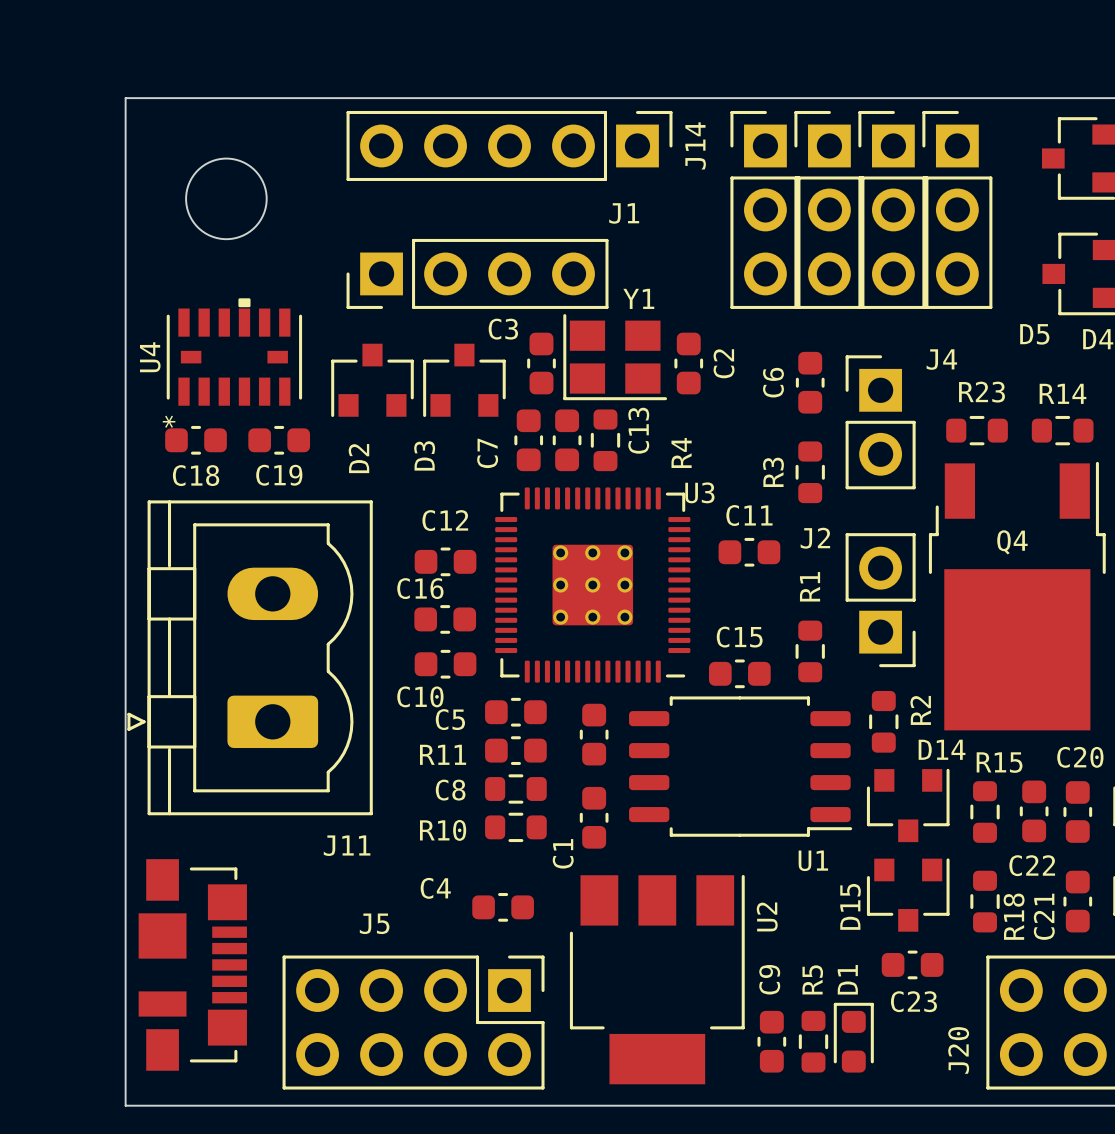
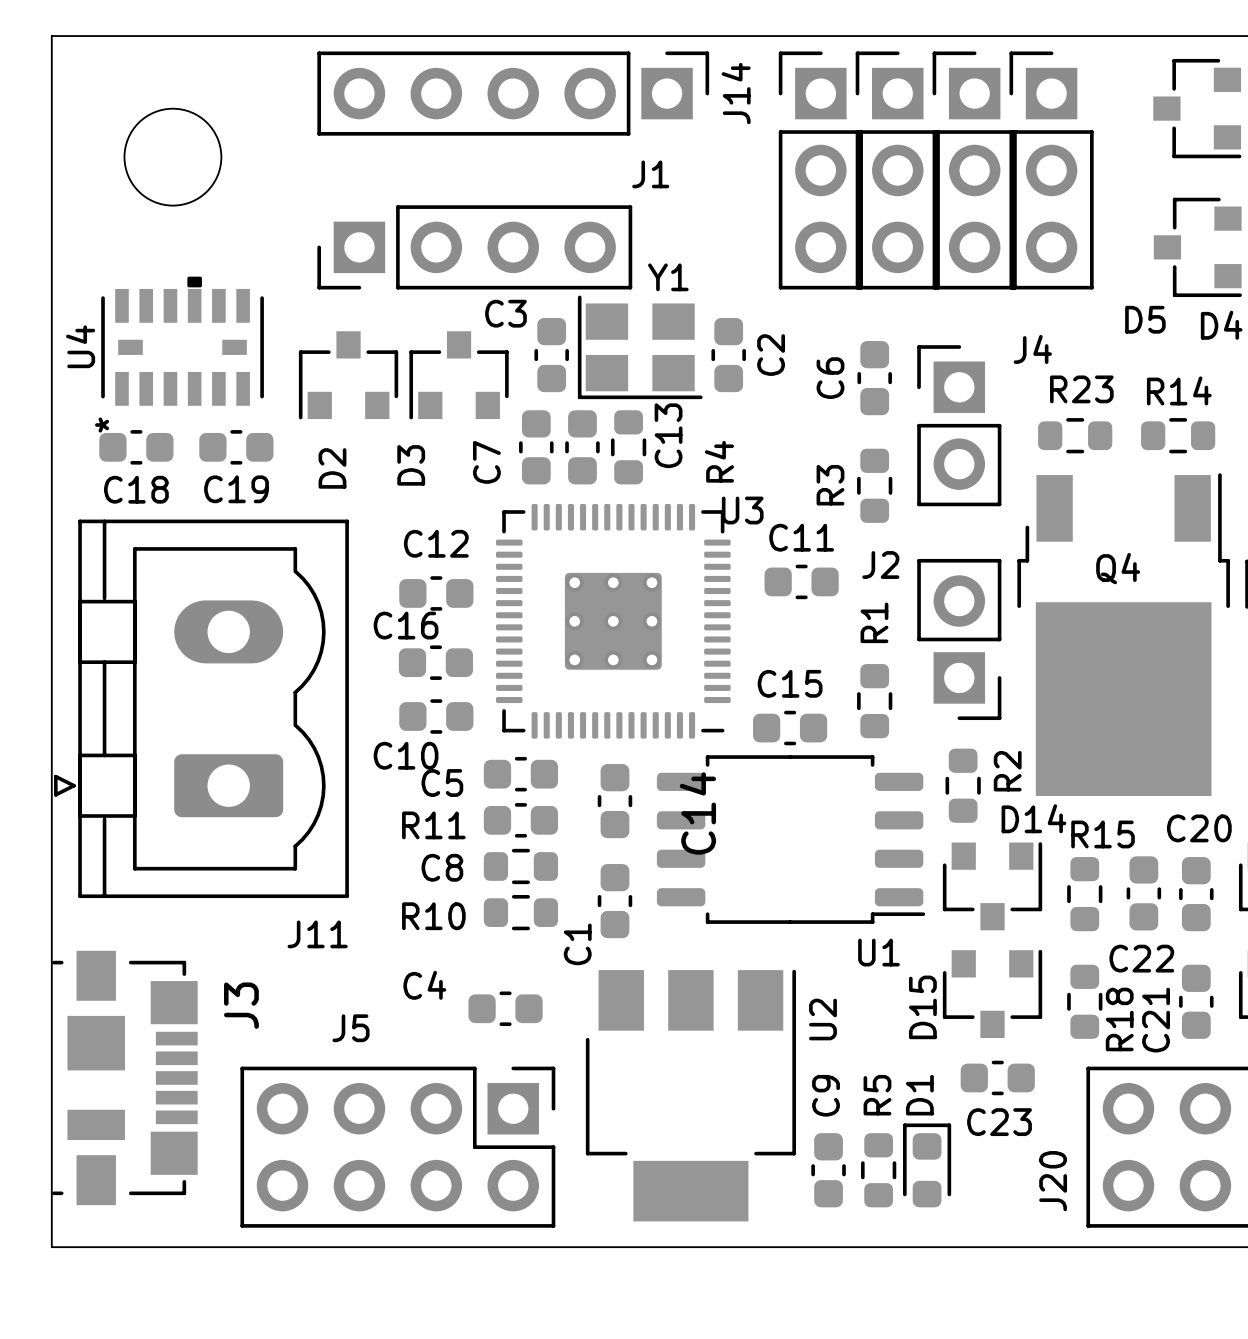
C14 name: none -> C14 (697, 813)
J3: none -> (124, 1077)

